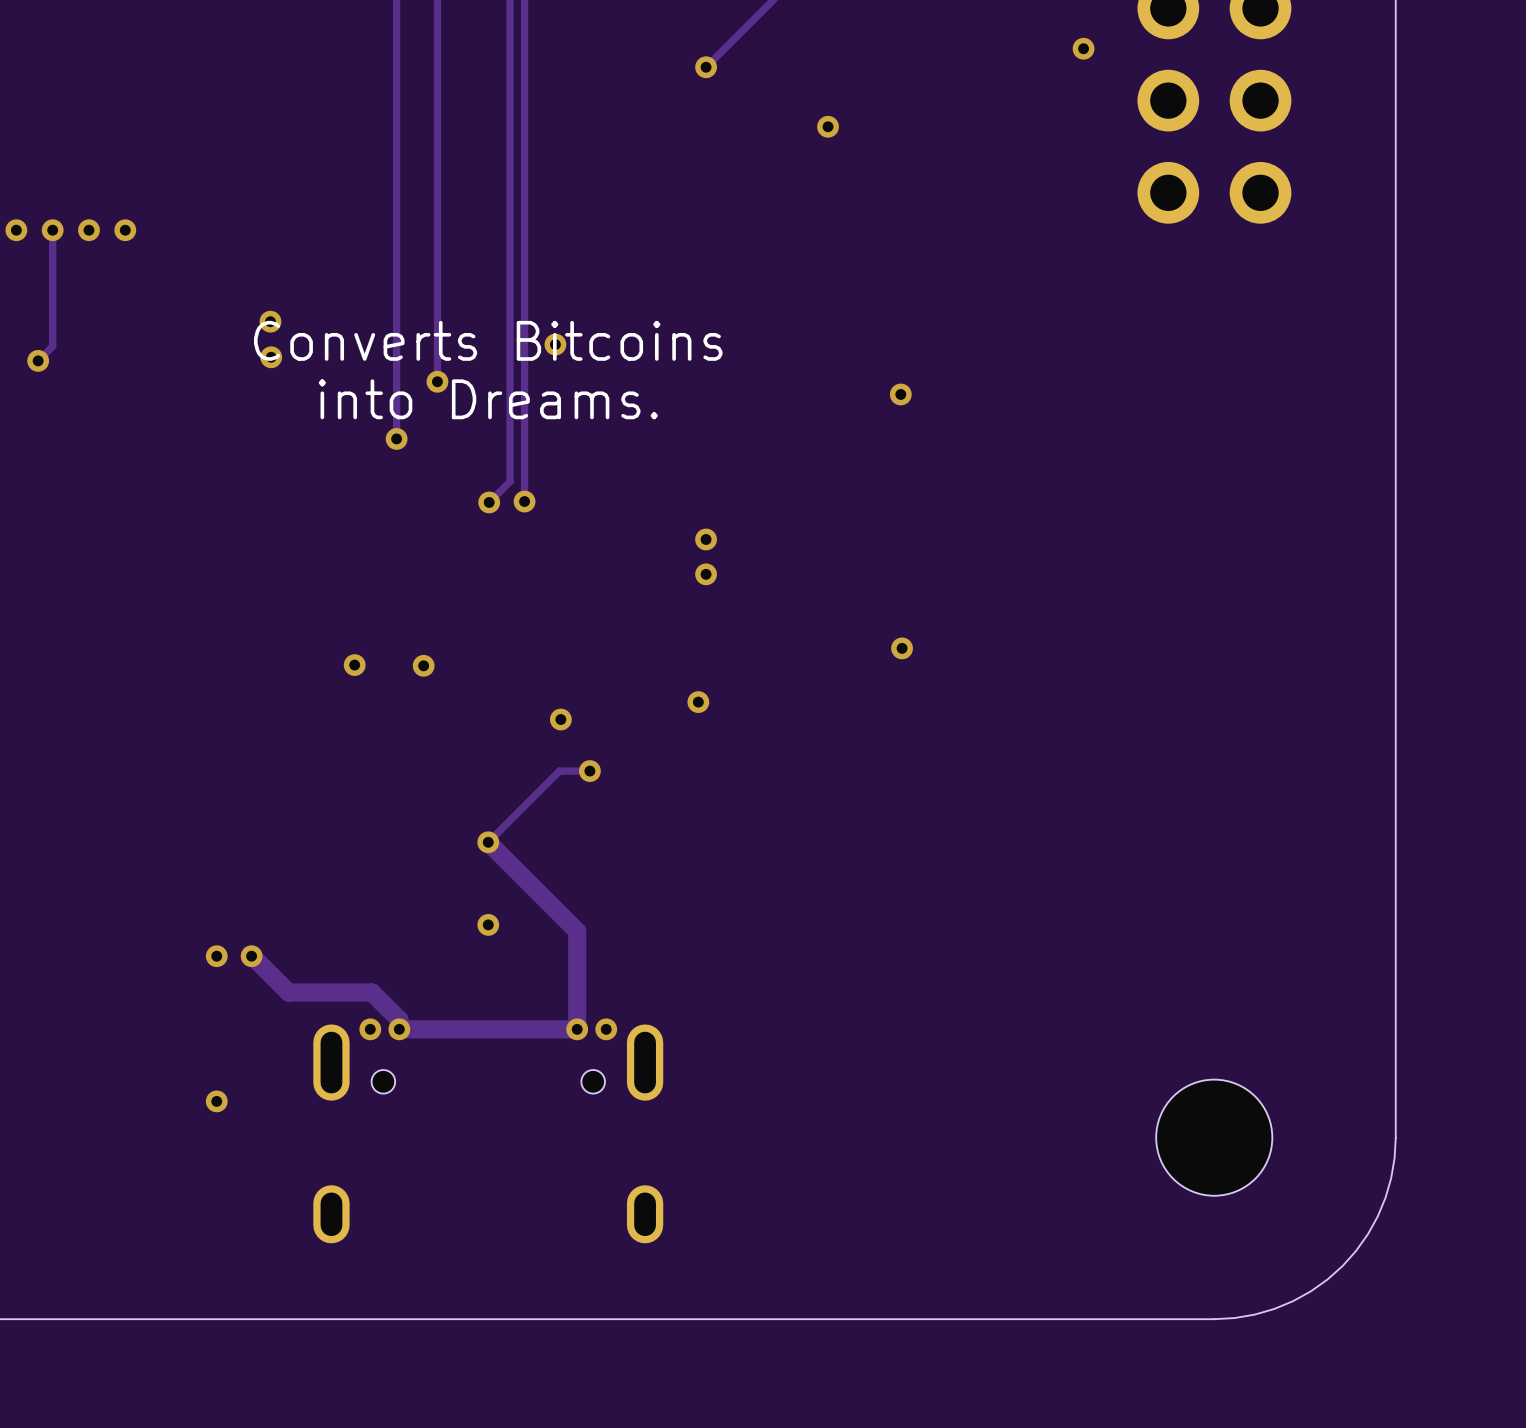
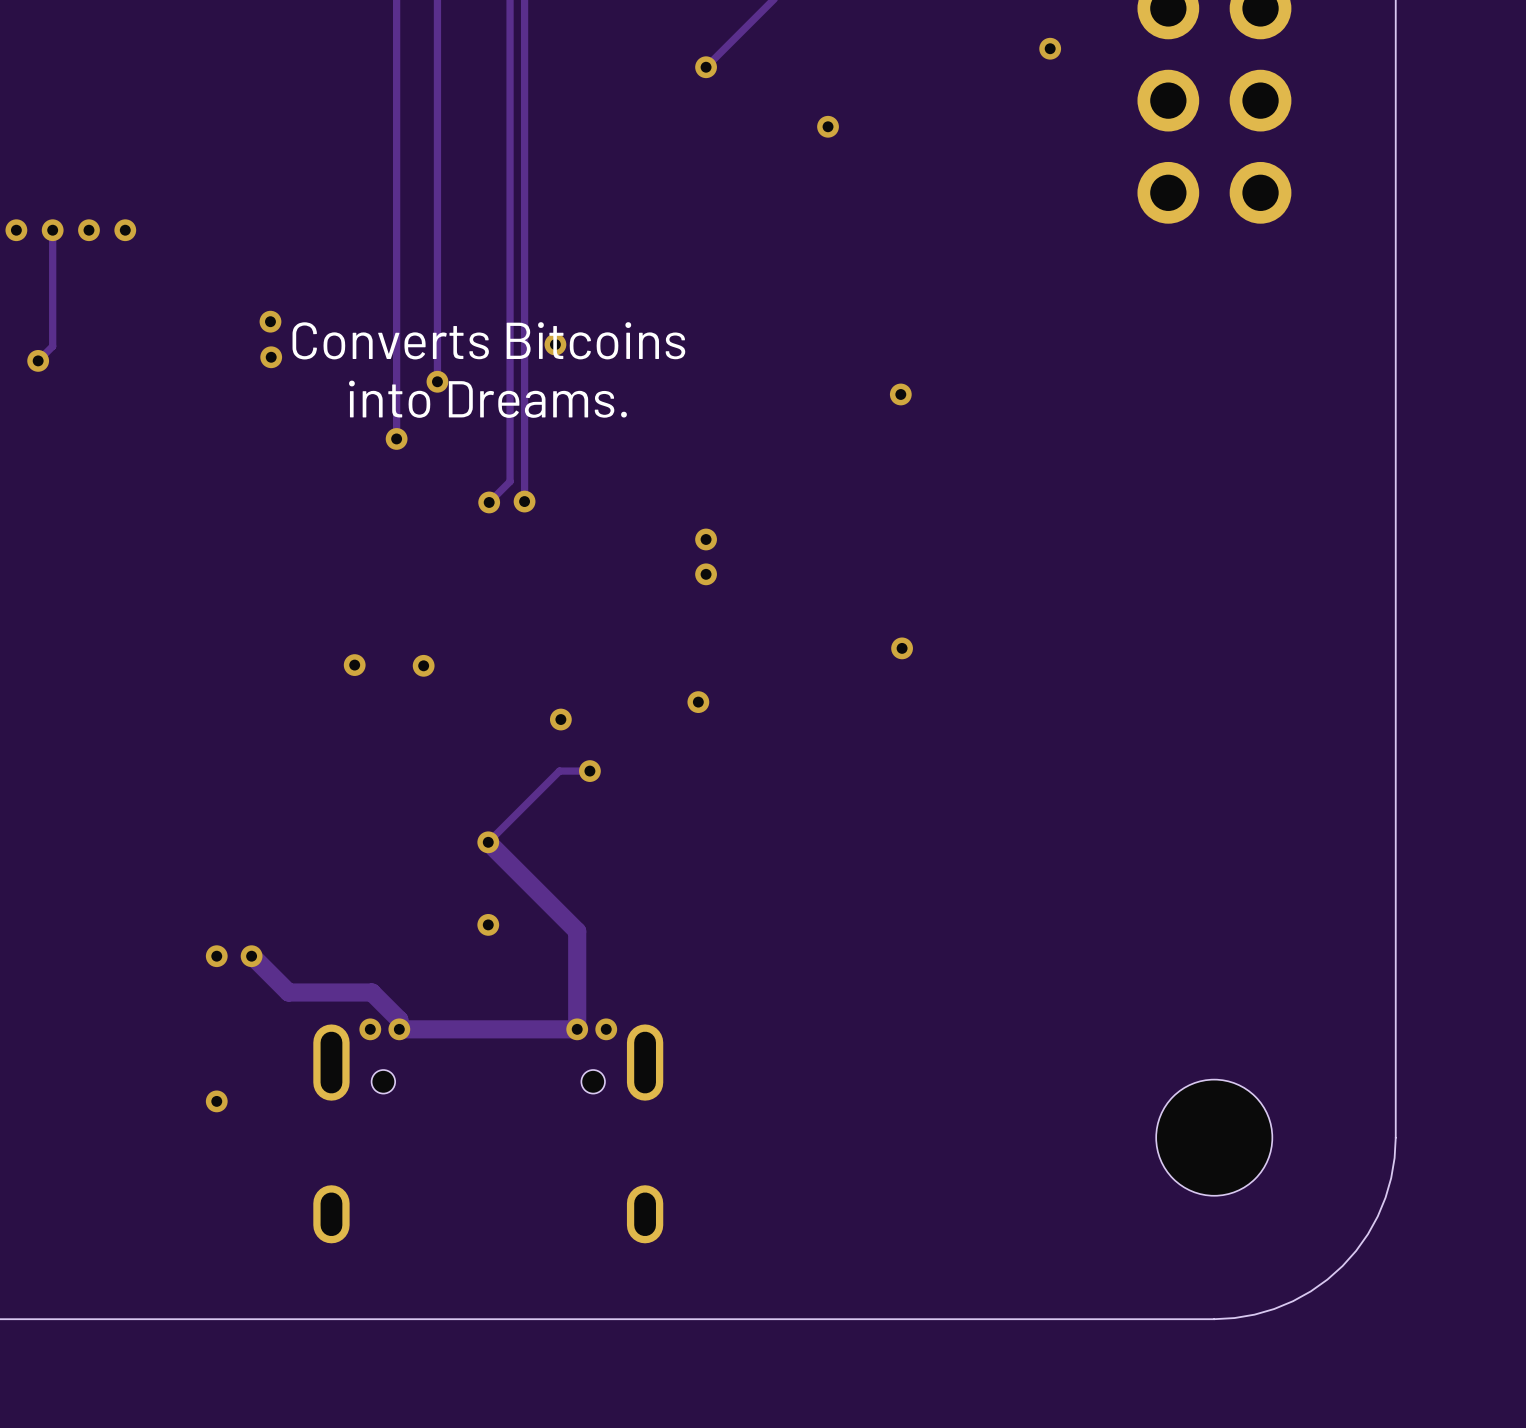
via position: (1083, 48) -> (1050, 48)

